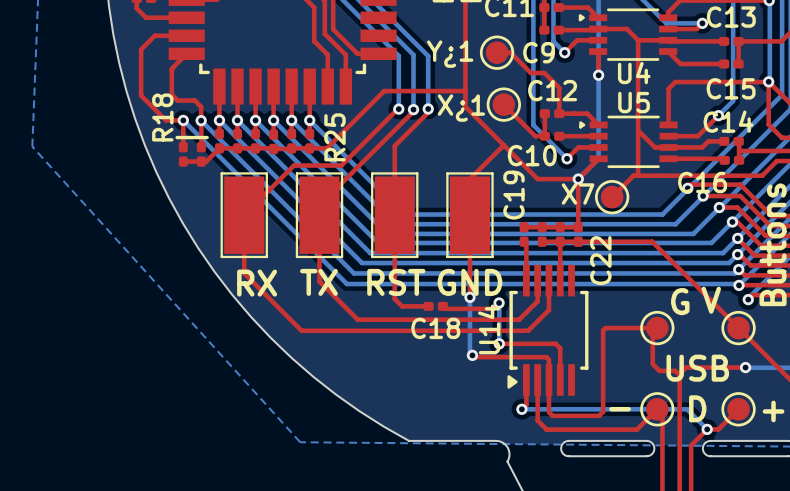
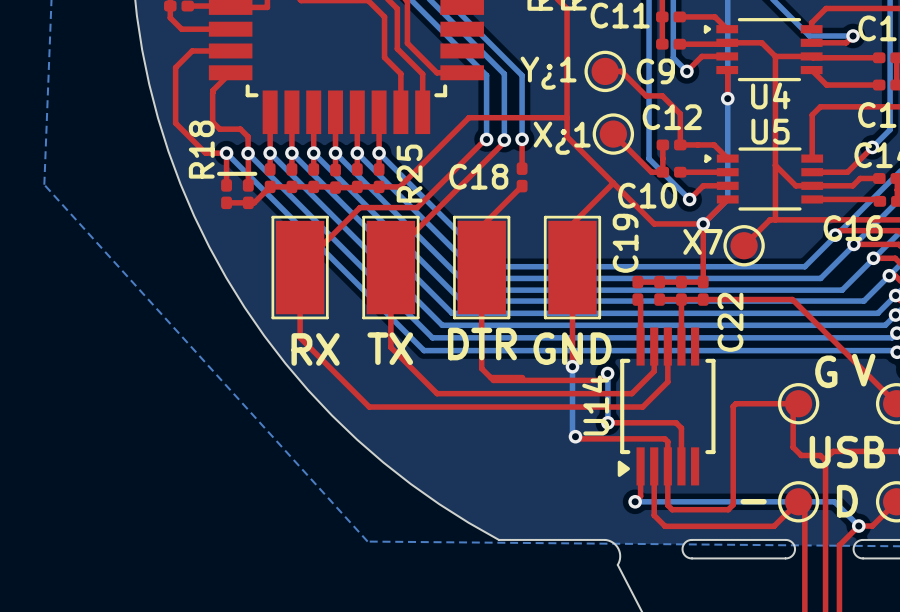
top track: (428, 112) (394, 145) (394, 180) -> (522, 186) (481, 226)
top track: none -> (522, 143) (522, 168)
text: RST (396, 282) -> DTR (482, 344)
C18 rotation: 0° (435, 306) -> 90° clockwise (522, 177)
C18 position: (435, 306) -> (522, 177)
top track: (443, 306) (445, 308) (493, 308) -> (490, 377) (493, 380) (600, 380)

